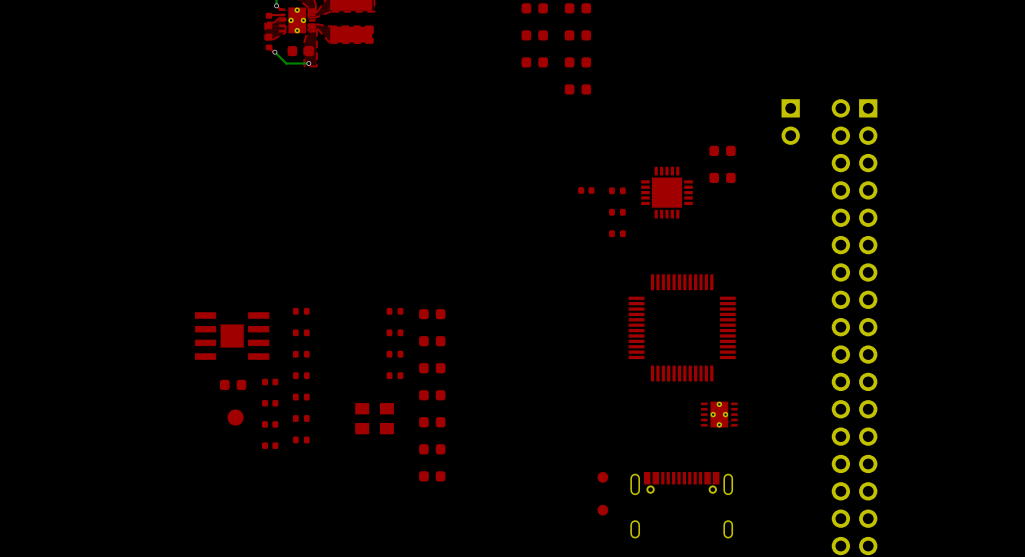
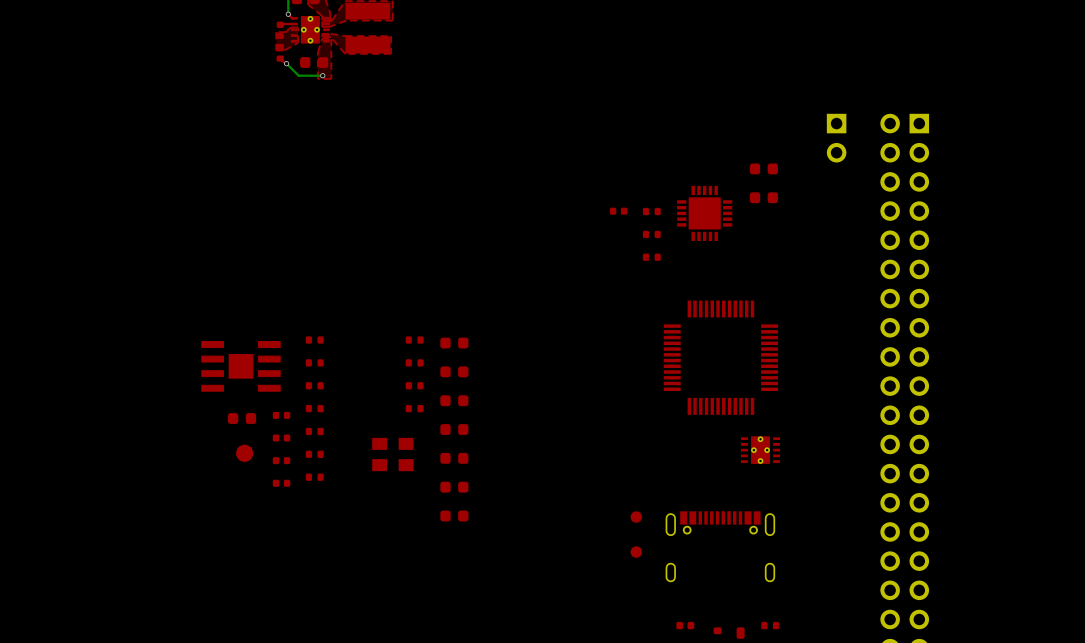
part: (534, 8) -> none
part: (577, 8) -> none
part: (534, 35) -> none
part: (577, 35) -> none
part: (534, 62) -> none
part: (577, 62) -> none
part: (577, 89) -> none

